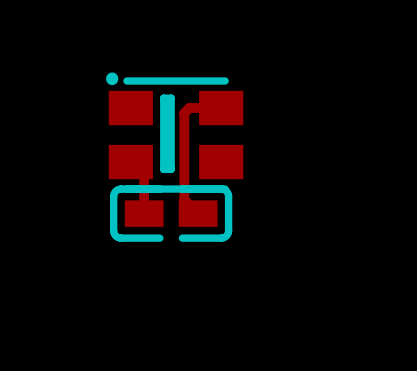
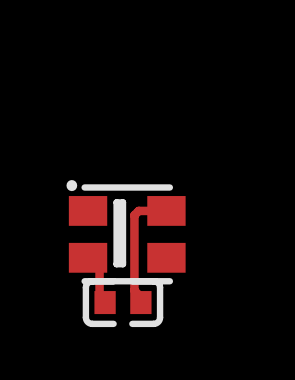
part footprint: [109, 185, 233, 242] -> [82, 278, 164, 328]

